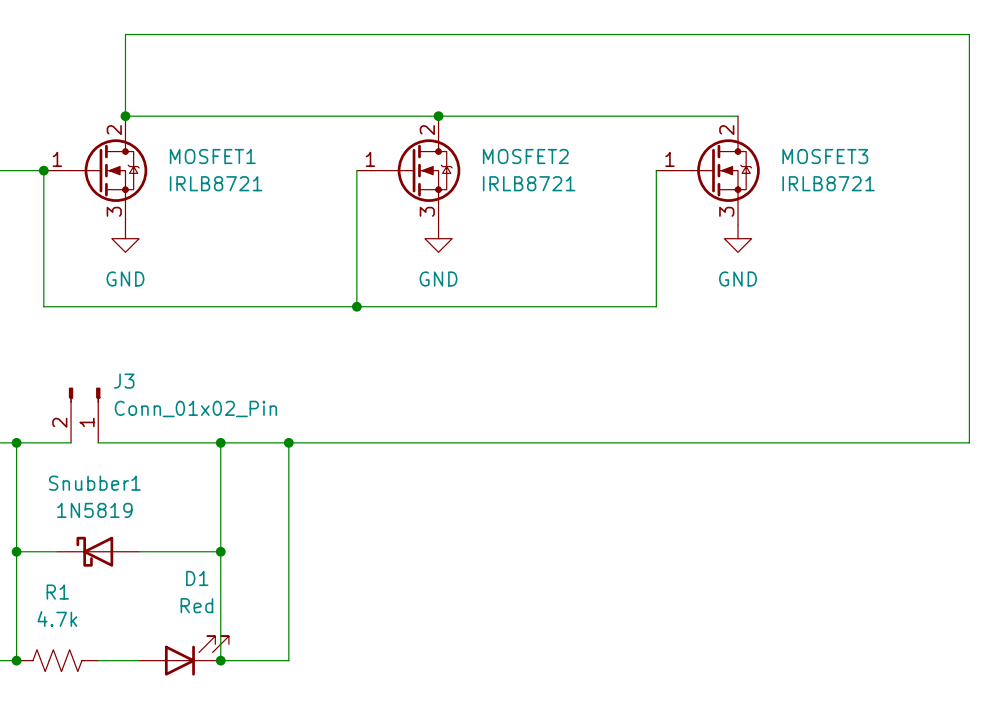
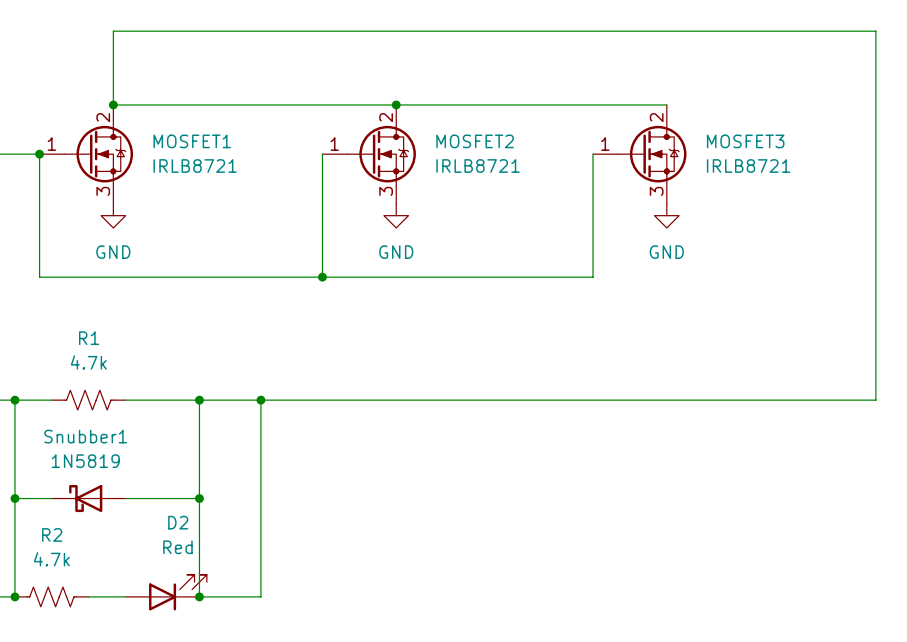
J3: Conn_01x02_Pin (84, 415) -> none
R1: none -> 4.7k (88, 400)
D1 name: D1 (197, 578) -> D2 (178, 522)
R1 name: R1 (57, 592) -> R2 (52, 534)

